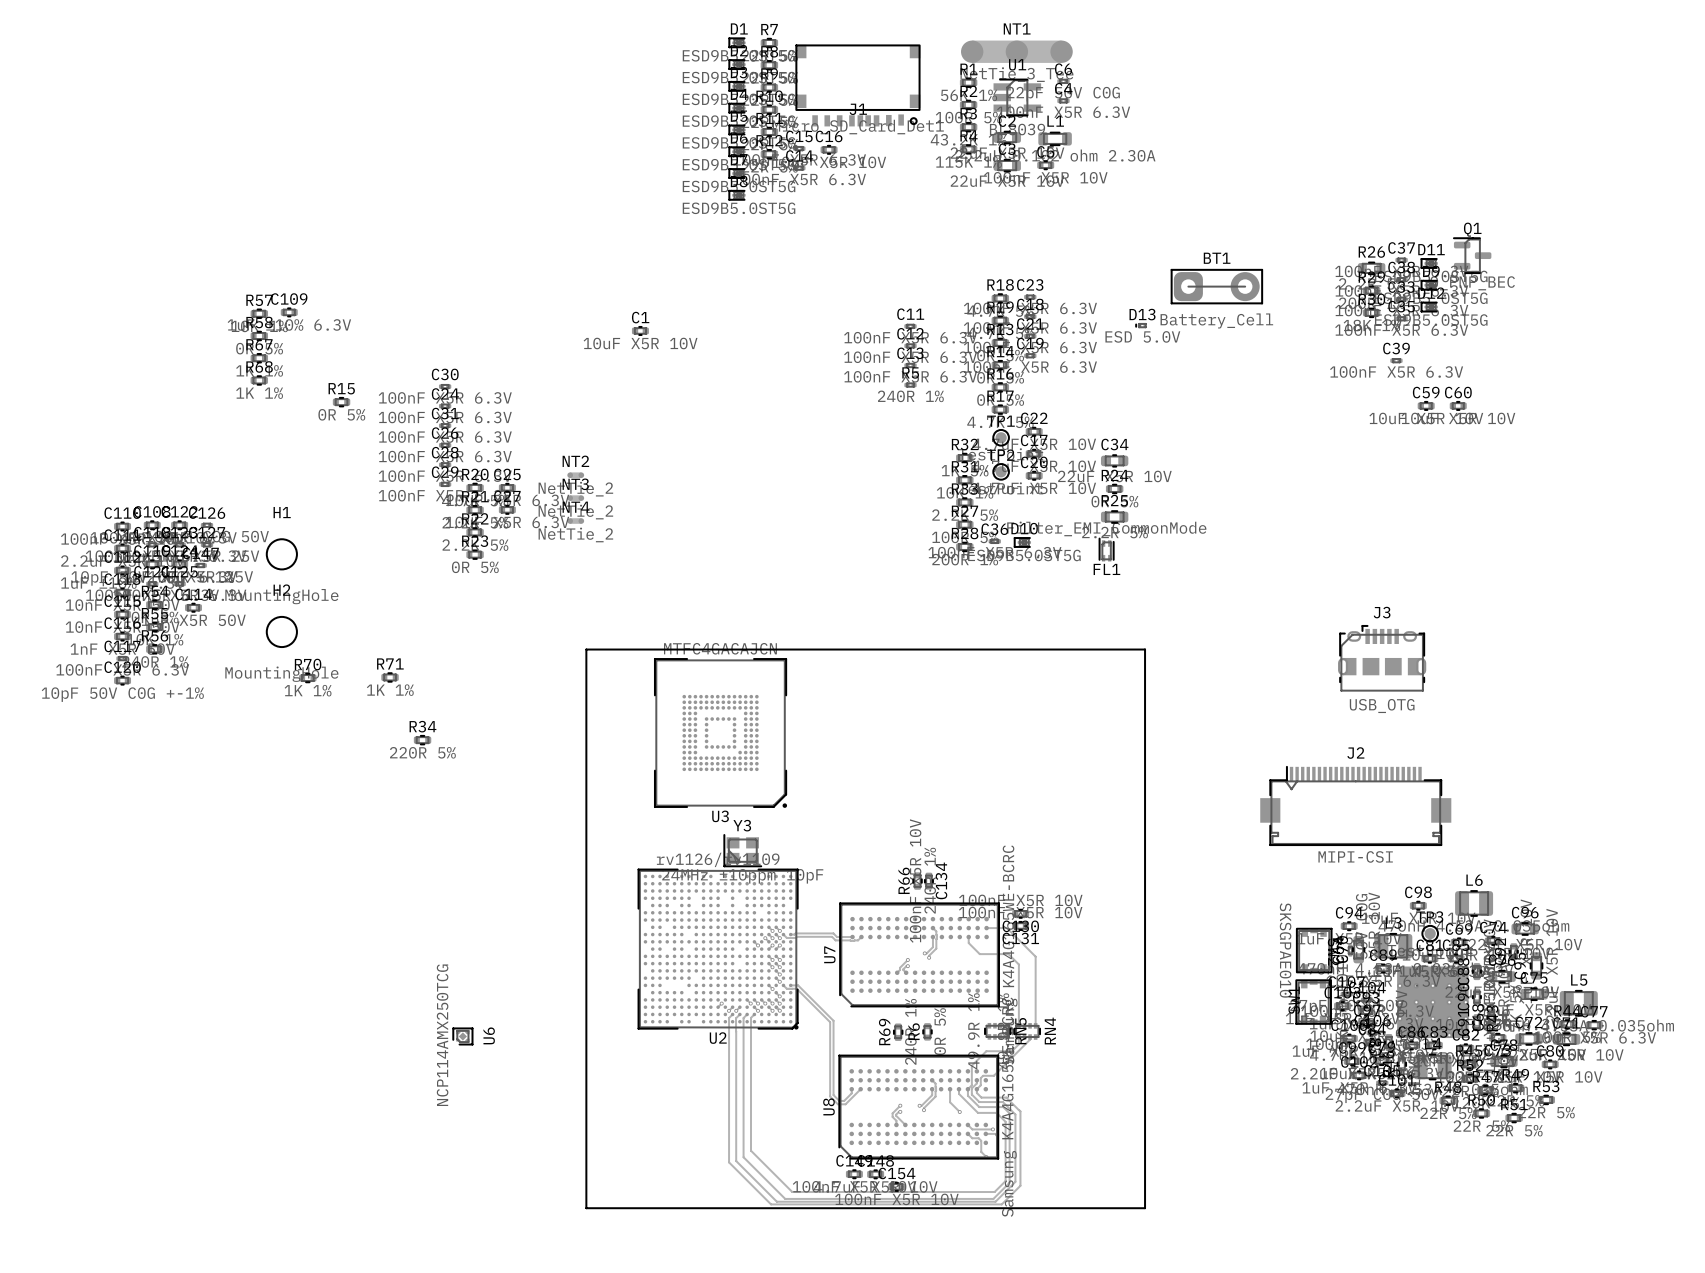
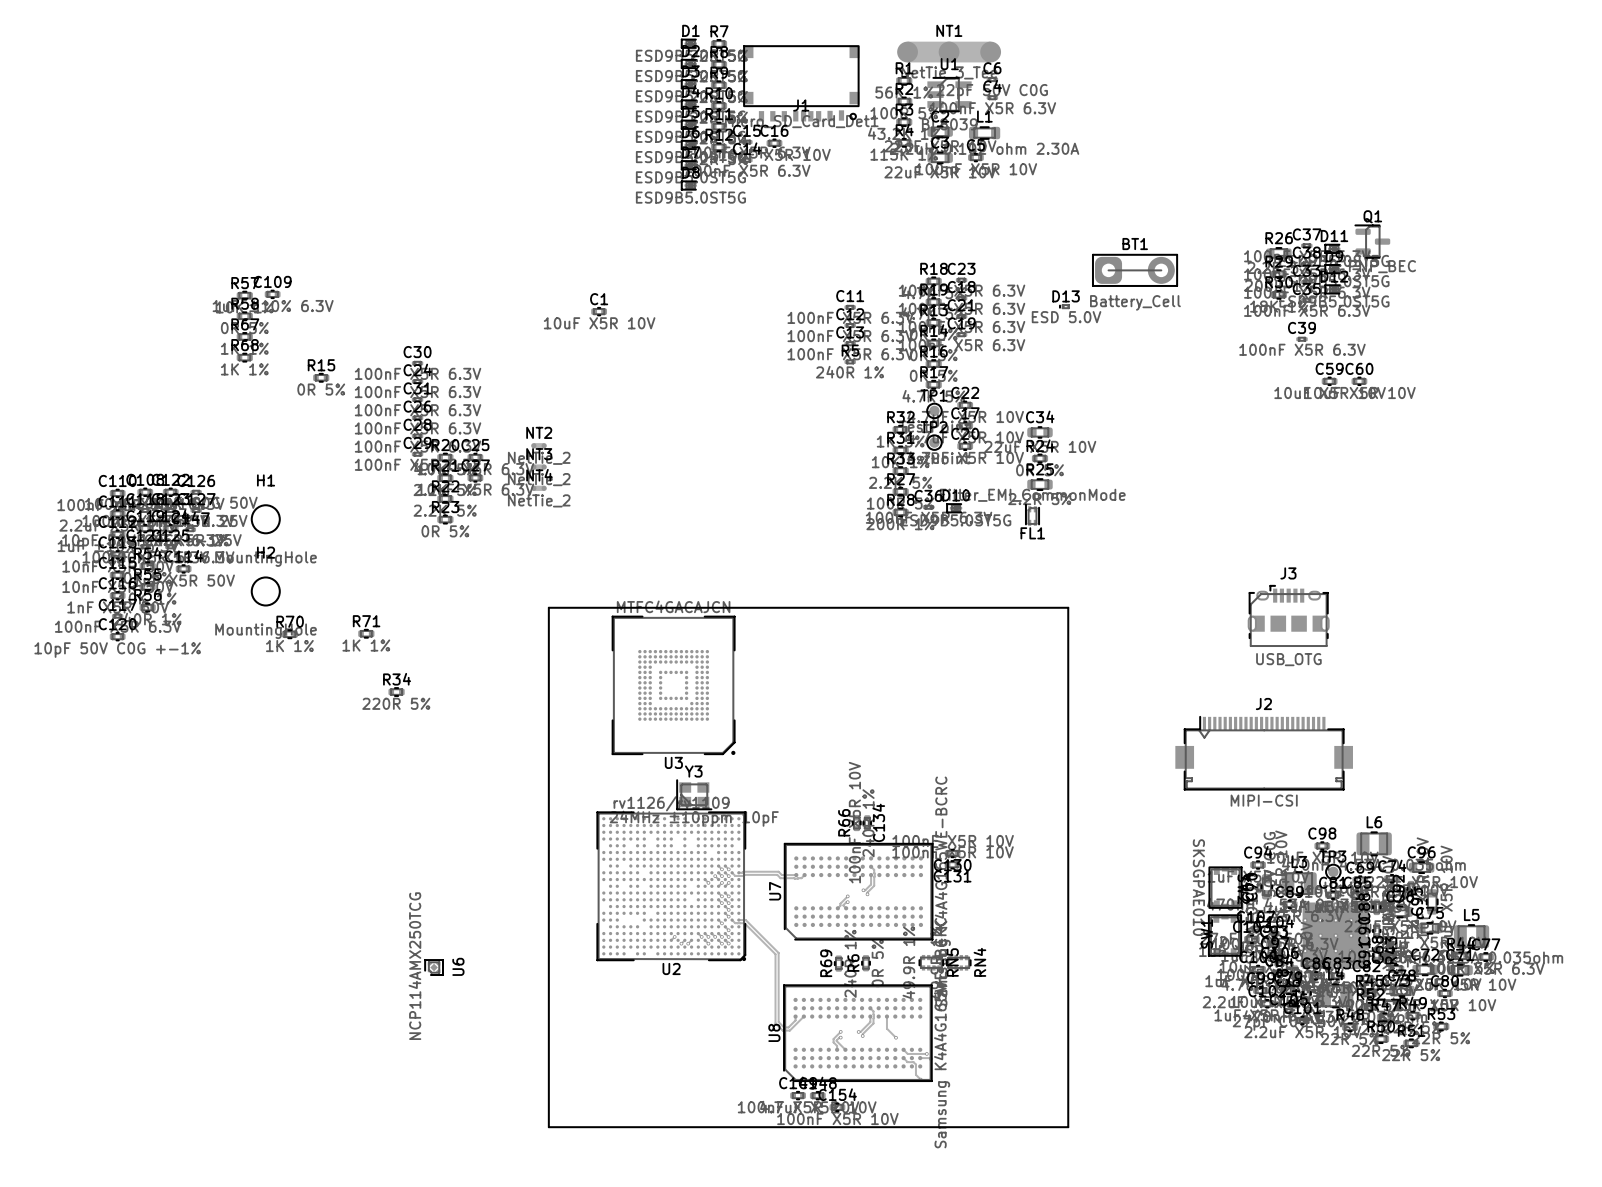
track: (986, 928) (1007, 928) (1035, 956) (1035, 1025) -> none
track: (968, 937) (968, 943) (979, 954) (1008, 954) (1018, 964) (1018, 1025) -> none
track: (732, 1014) (729, 1018) (729, 1162) (771, 1204) (1001, 1204) (1020, 1185) (1019, 1110) -> none
track: (739, 1014) (736, 1018) (736, 1161) (776, 1201) (995, 1201) (1015, 1181) (1015, 1114) (1002, 1102) (979, 1102) (971, 1094) (971, 1088) (976, 1083) (976, 1080) -> none
track: (747, 1014) (743, 1018) (743, 1157) (785, 1198) (993, 1198) (1009, 1182) (1009, 1113) (1003, 1107) (979, 1107) (967, 1095) (967, 1089) (971, 1085) (971, 1065) (986, 1051) (1011, 1051) (1018, 1044) (1018, 1037) -> none
track: (754, 1014) (751, 1017) (751, 1150) (792, 1192) (994, 1192) (1005, 1181) (1005, 1121) (996, 1112) (977, 1112) (959, 1093) (959, 1089) -> none
track: (1030, 1037) (1030, 1039) (993, 1075) (983, 1075) (980, 1078) (980, 1085) (976, 1089) (976, 1093) (981, 1097) (1006, 1097) (1018, 1110) -> none

